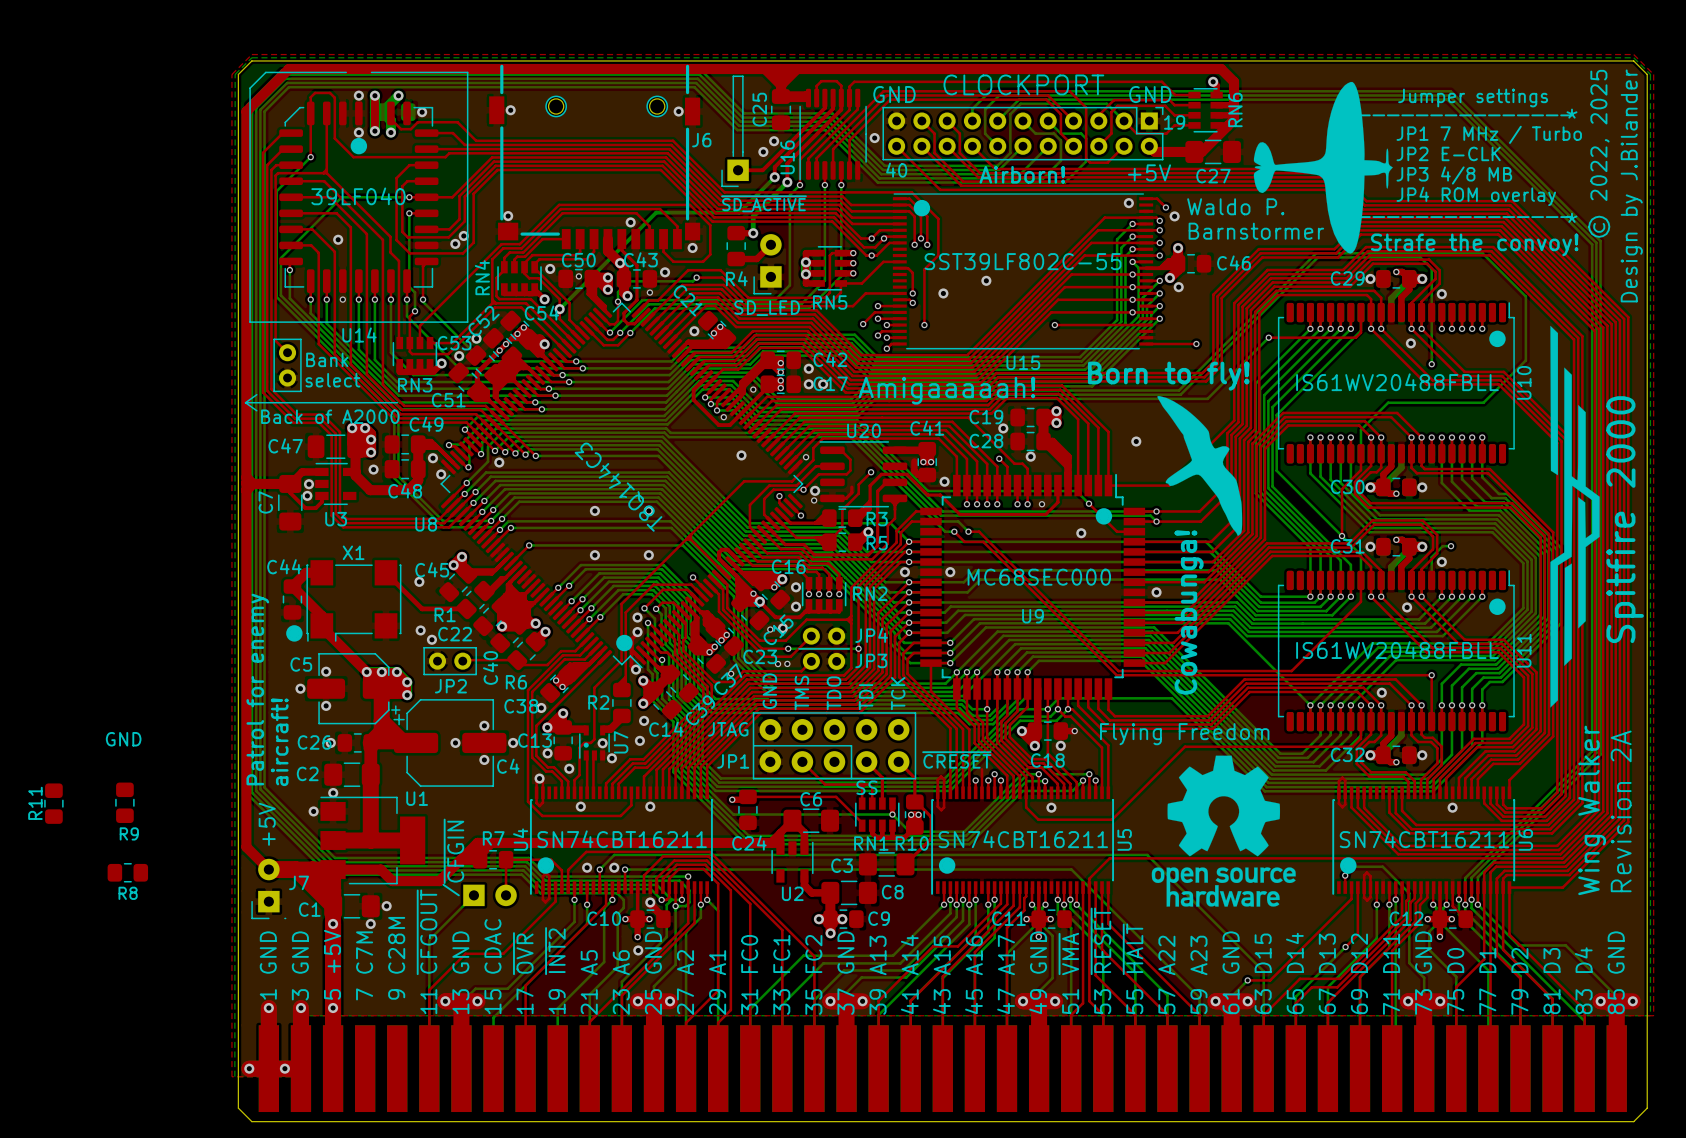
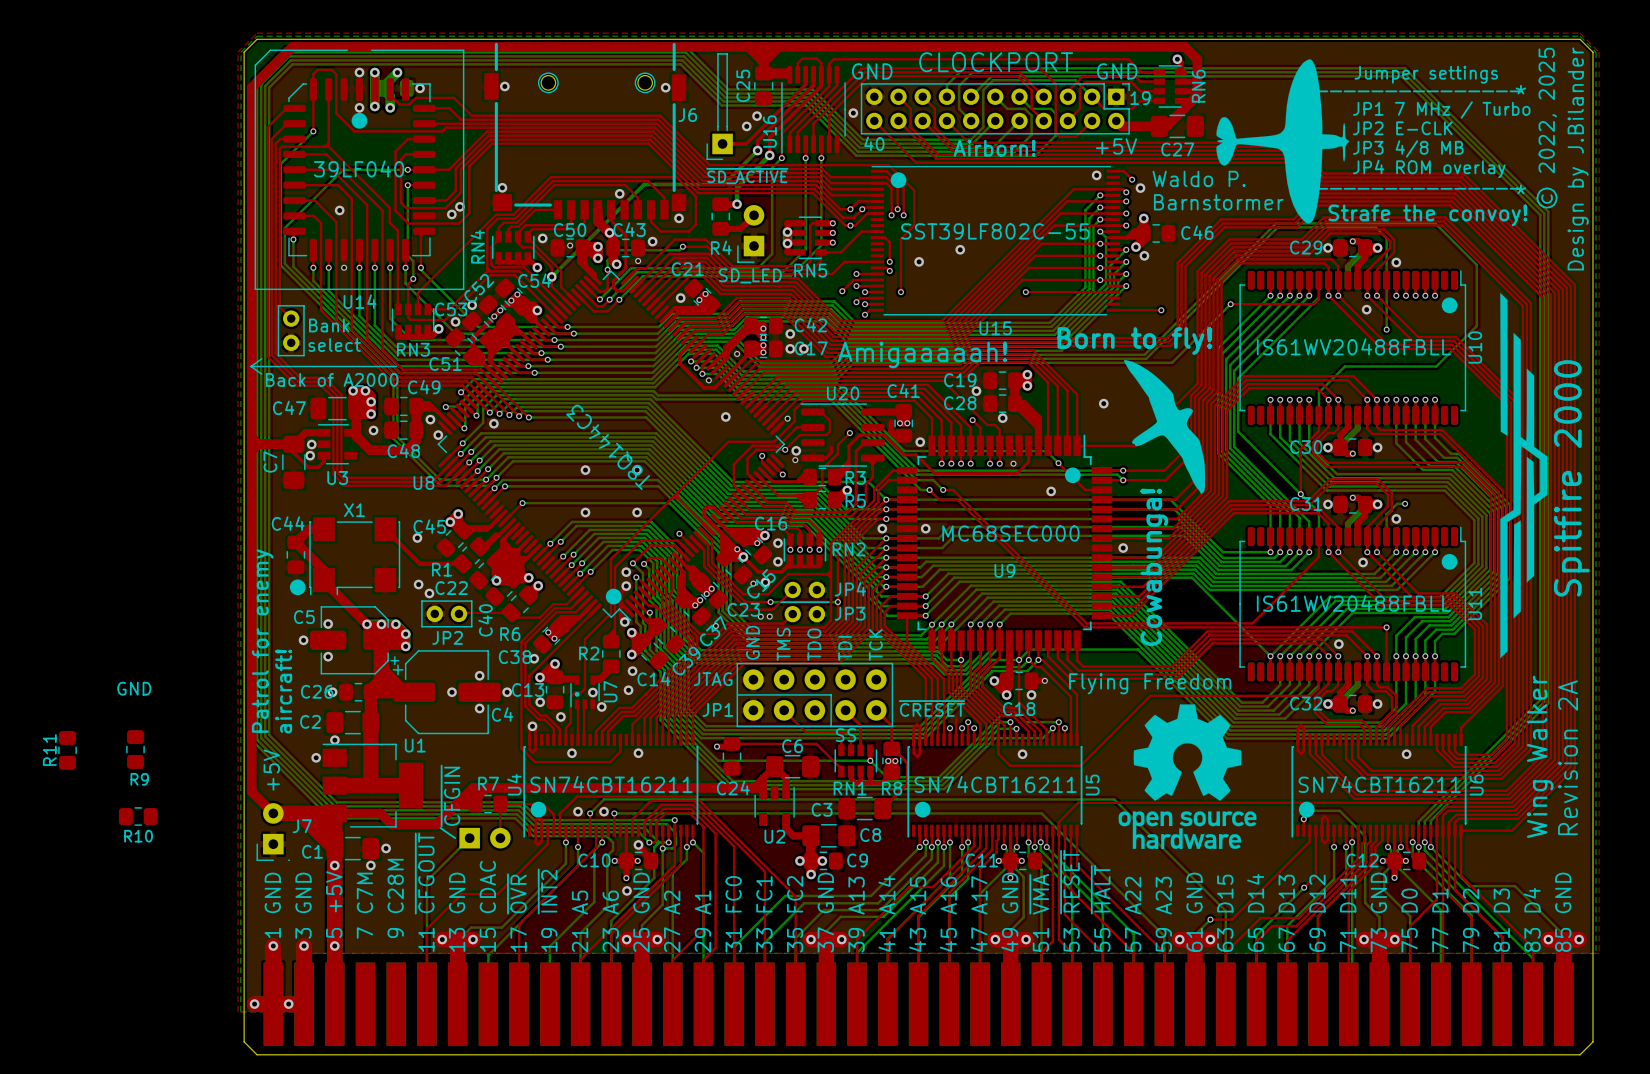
C21 name rotation: 0° (688, 300) -> 45° counterclockwise (687, 269)
R10 name: R10 (912, 843) -> R8 (892, 788)
R8 name: R8 (128, 893) -> R10 (138, 836)

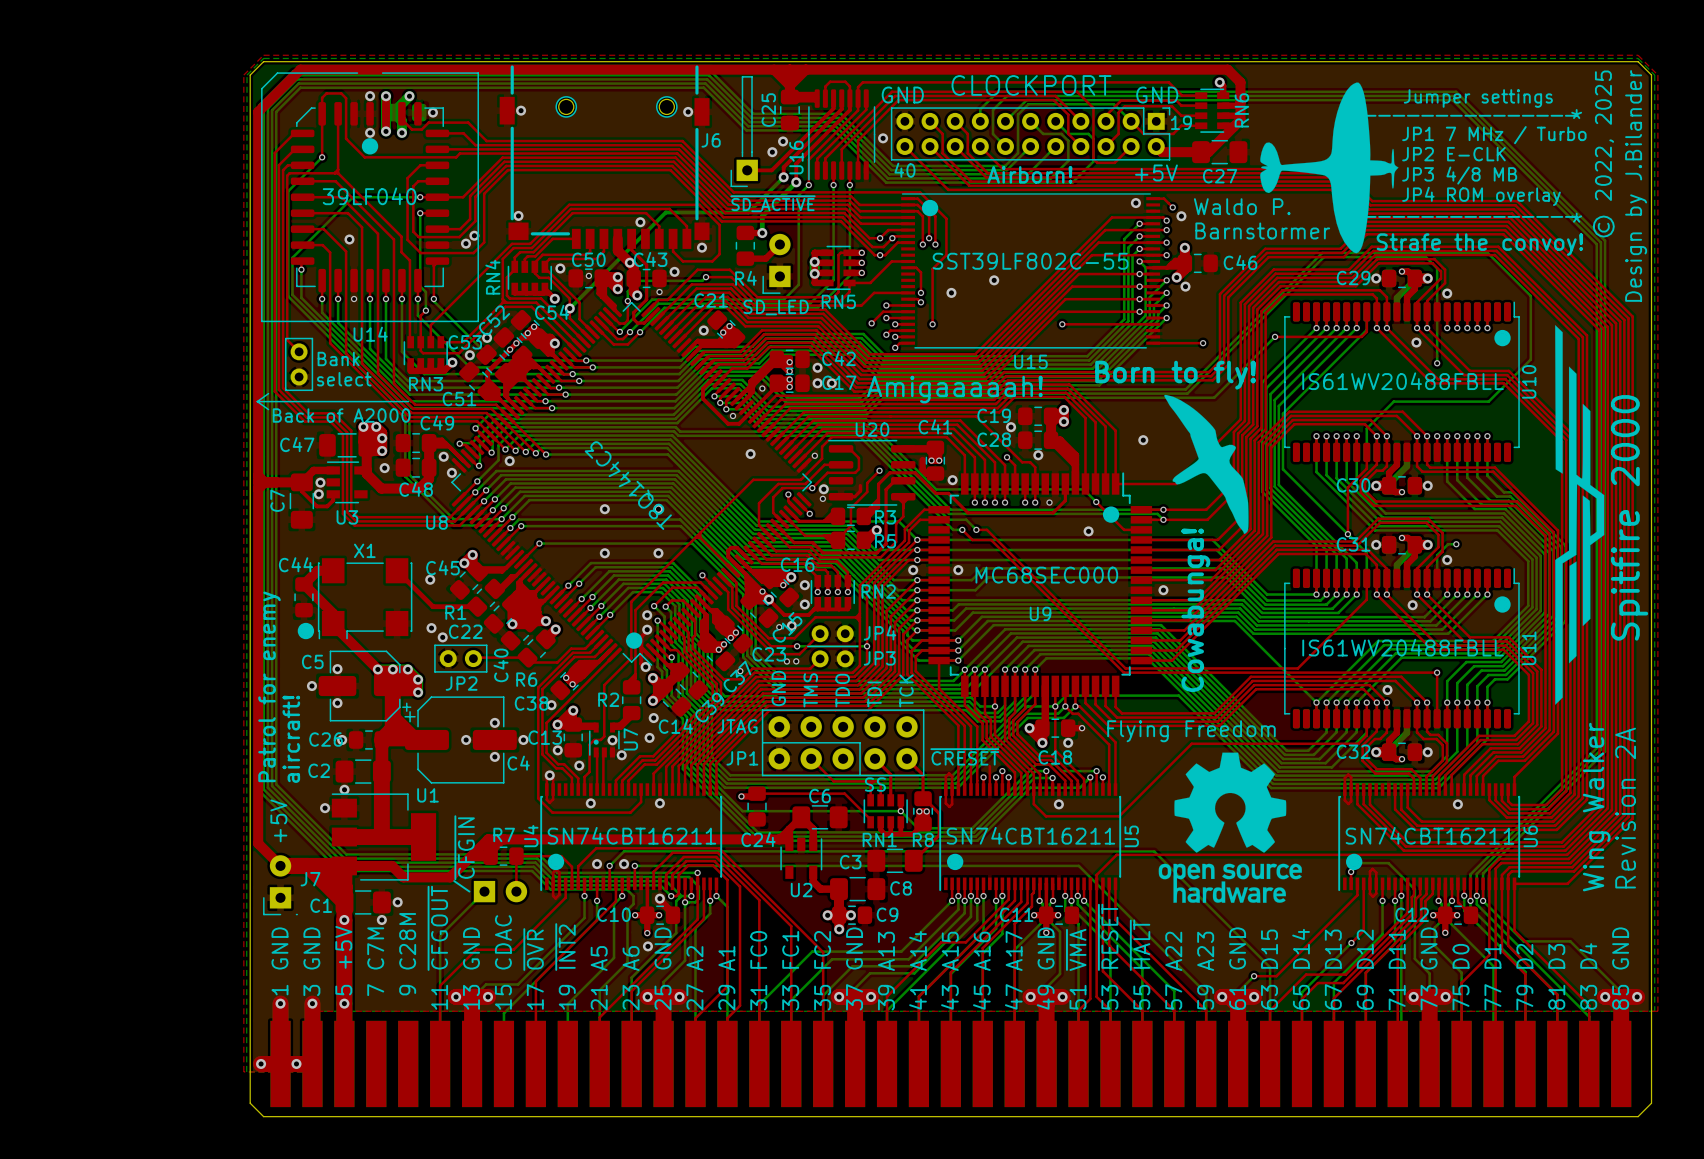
text: GND (134, 688) -> none
R9: (135, 749) -> none
R11: (67, 750) -> none
R10: (138, 816) -> none

